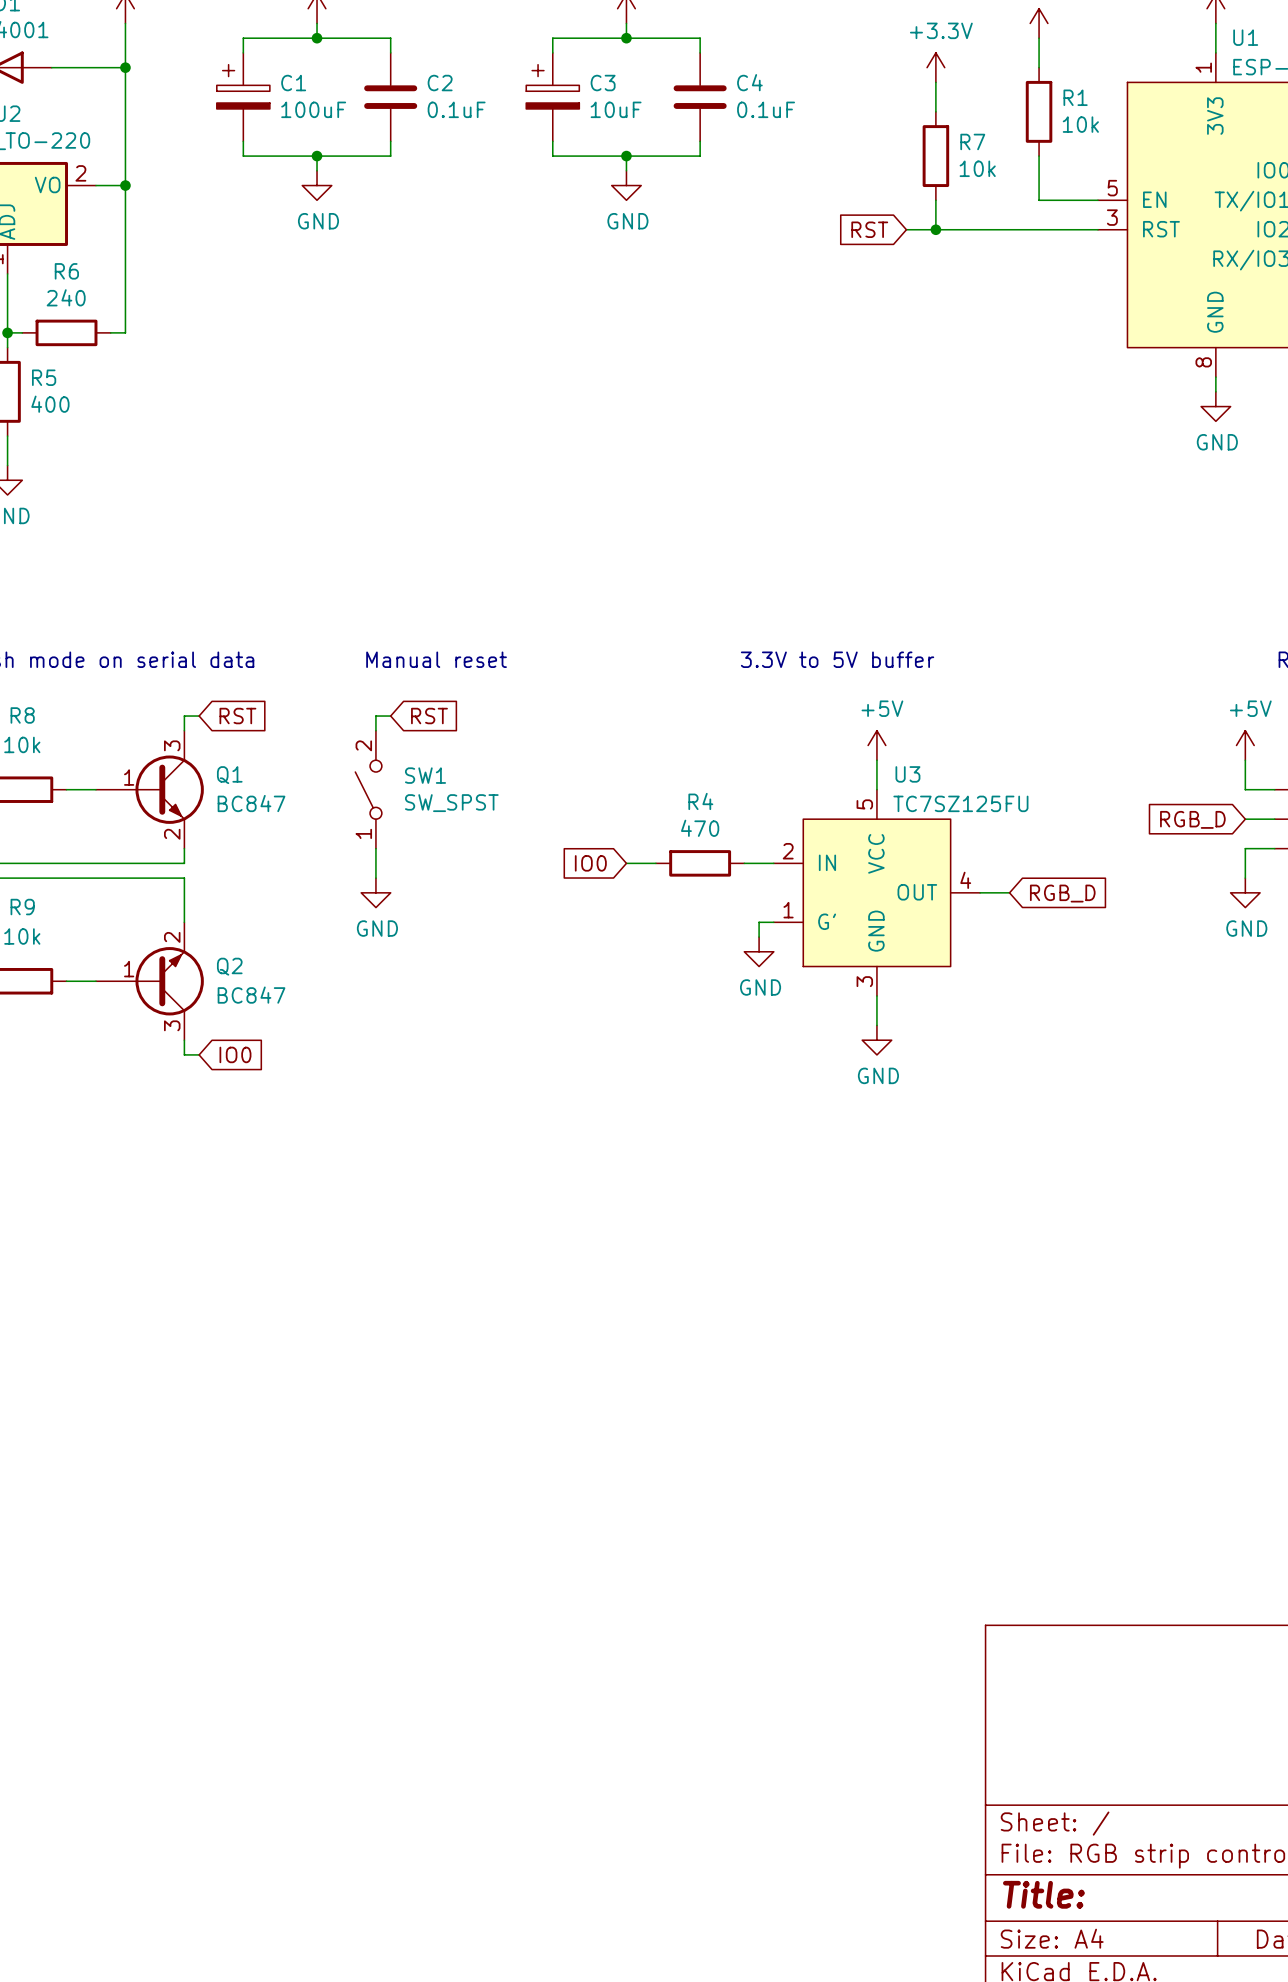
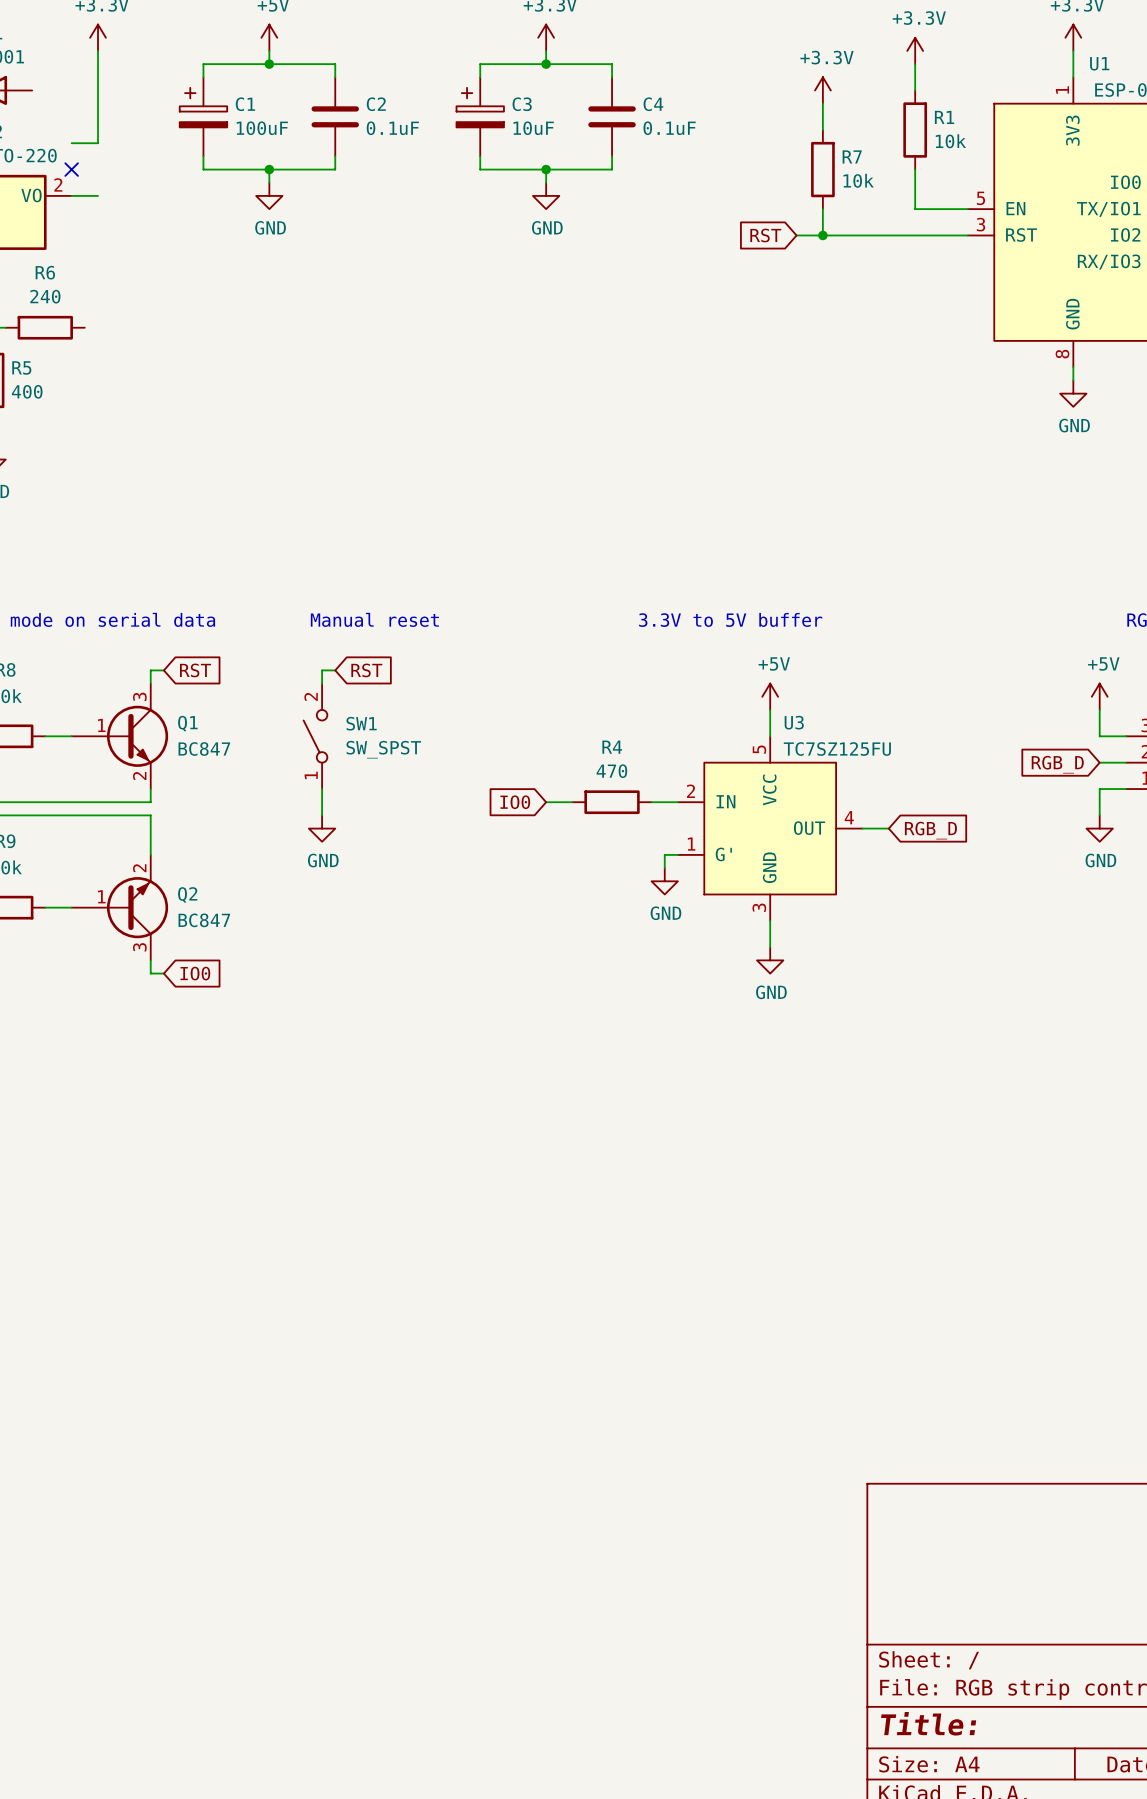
wire: (51, 67) (125, 67) -> none
junction: (125, 67) -> none
wire: (125, 126) (125, 332) (110, 332) -> (98, 143) (71, 143)
no-connect mark: none -> (71, 169)
junction: (125, 185) -> none

